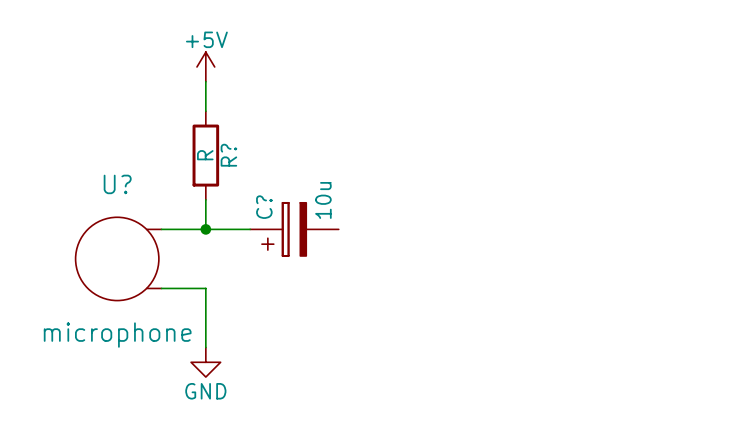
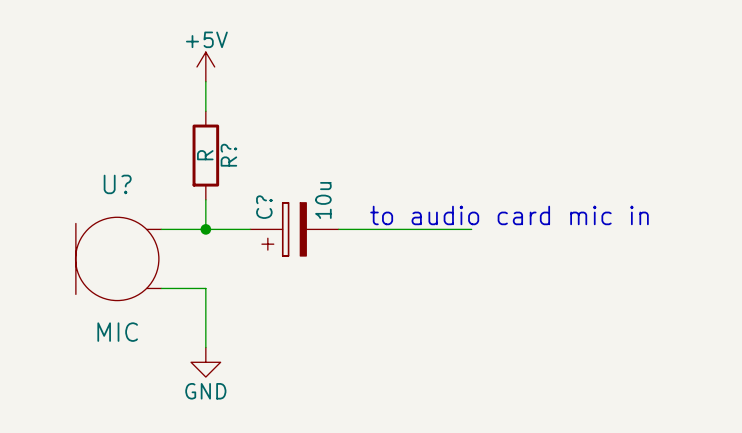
text: none -> to audio card mic in (509, 215)
U? symbol: [75, 217, 162, 301] -> [75, 217, 162, 301]
wire: none -> (338, 229) (471, 229)
U? value: microphone (117, 335) -> MIC (117, 332)

